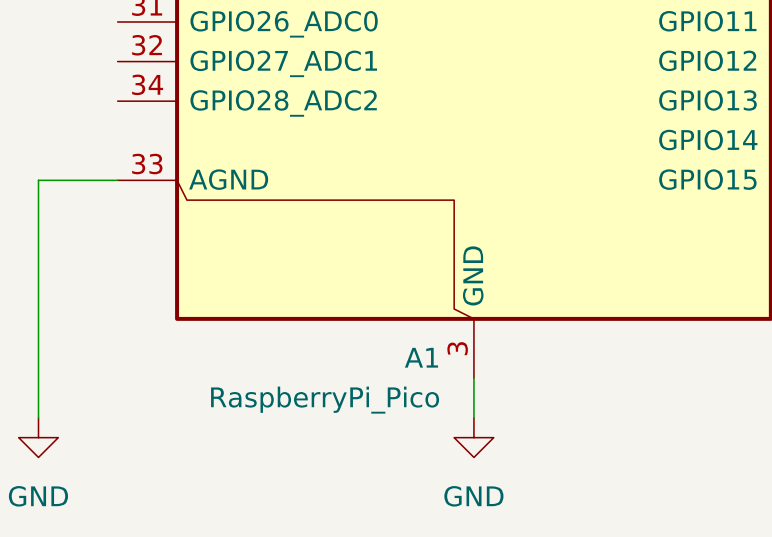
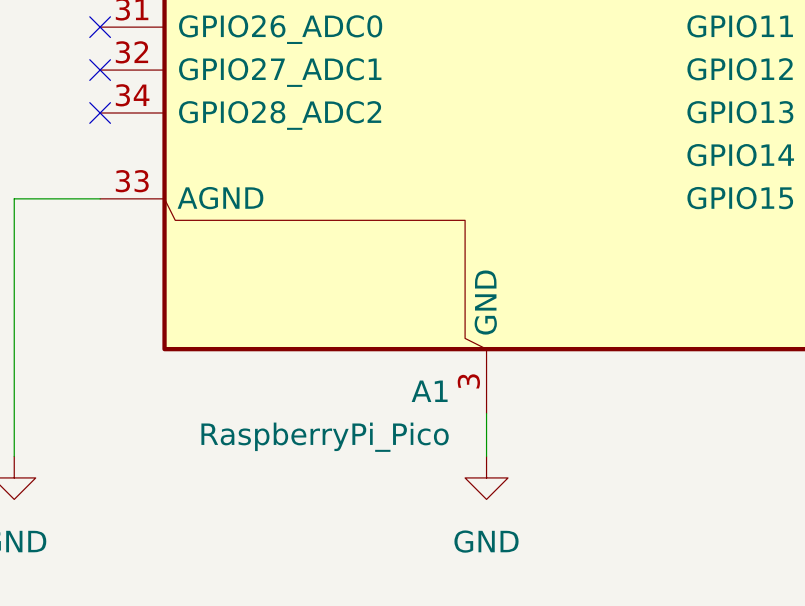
no-connect mark: none -> (100, 27)
no-connect mark: none -> (100, 70)
no-connect mark: none -> (100, 112)

